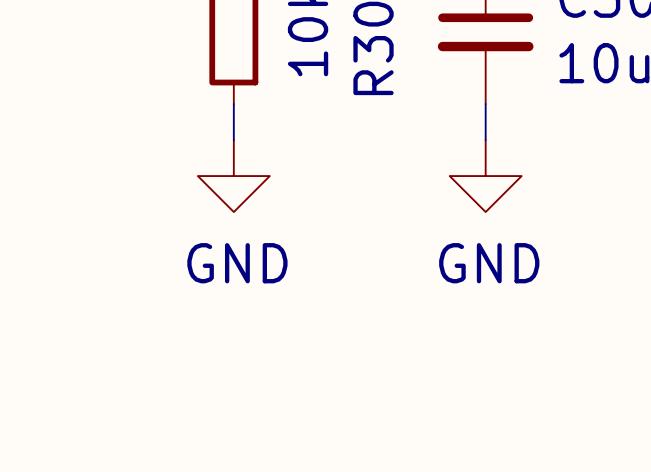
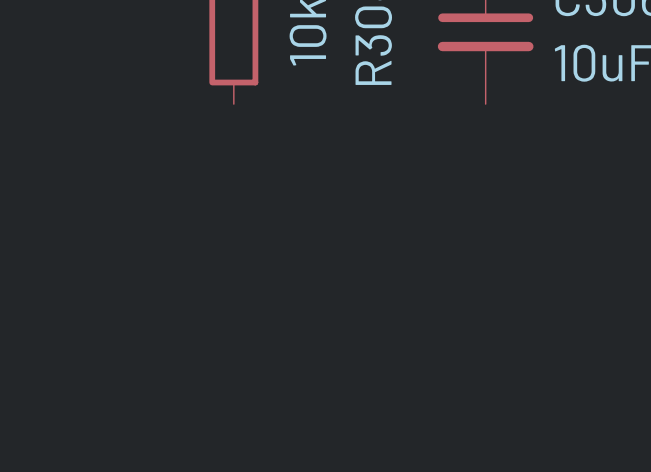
wire: (233, 104) (233, 140) -> none
wire: (485, 104) (485, 140) -> none
power symbol: GND (233, 176) -> none
power symbol: GND (485, 176) -> none

